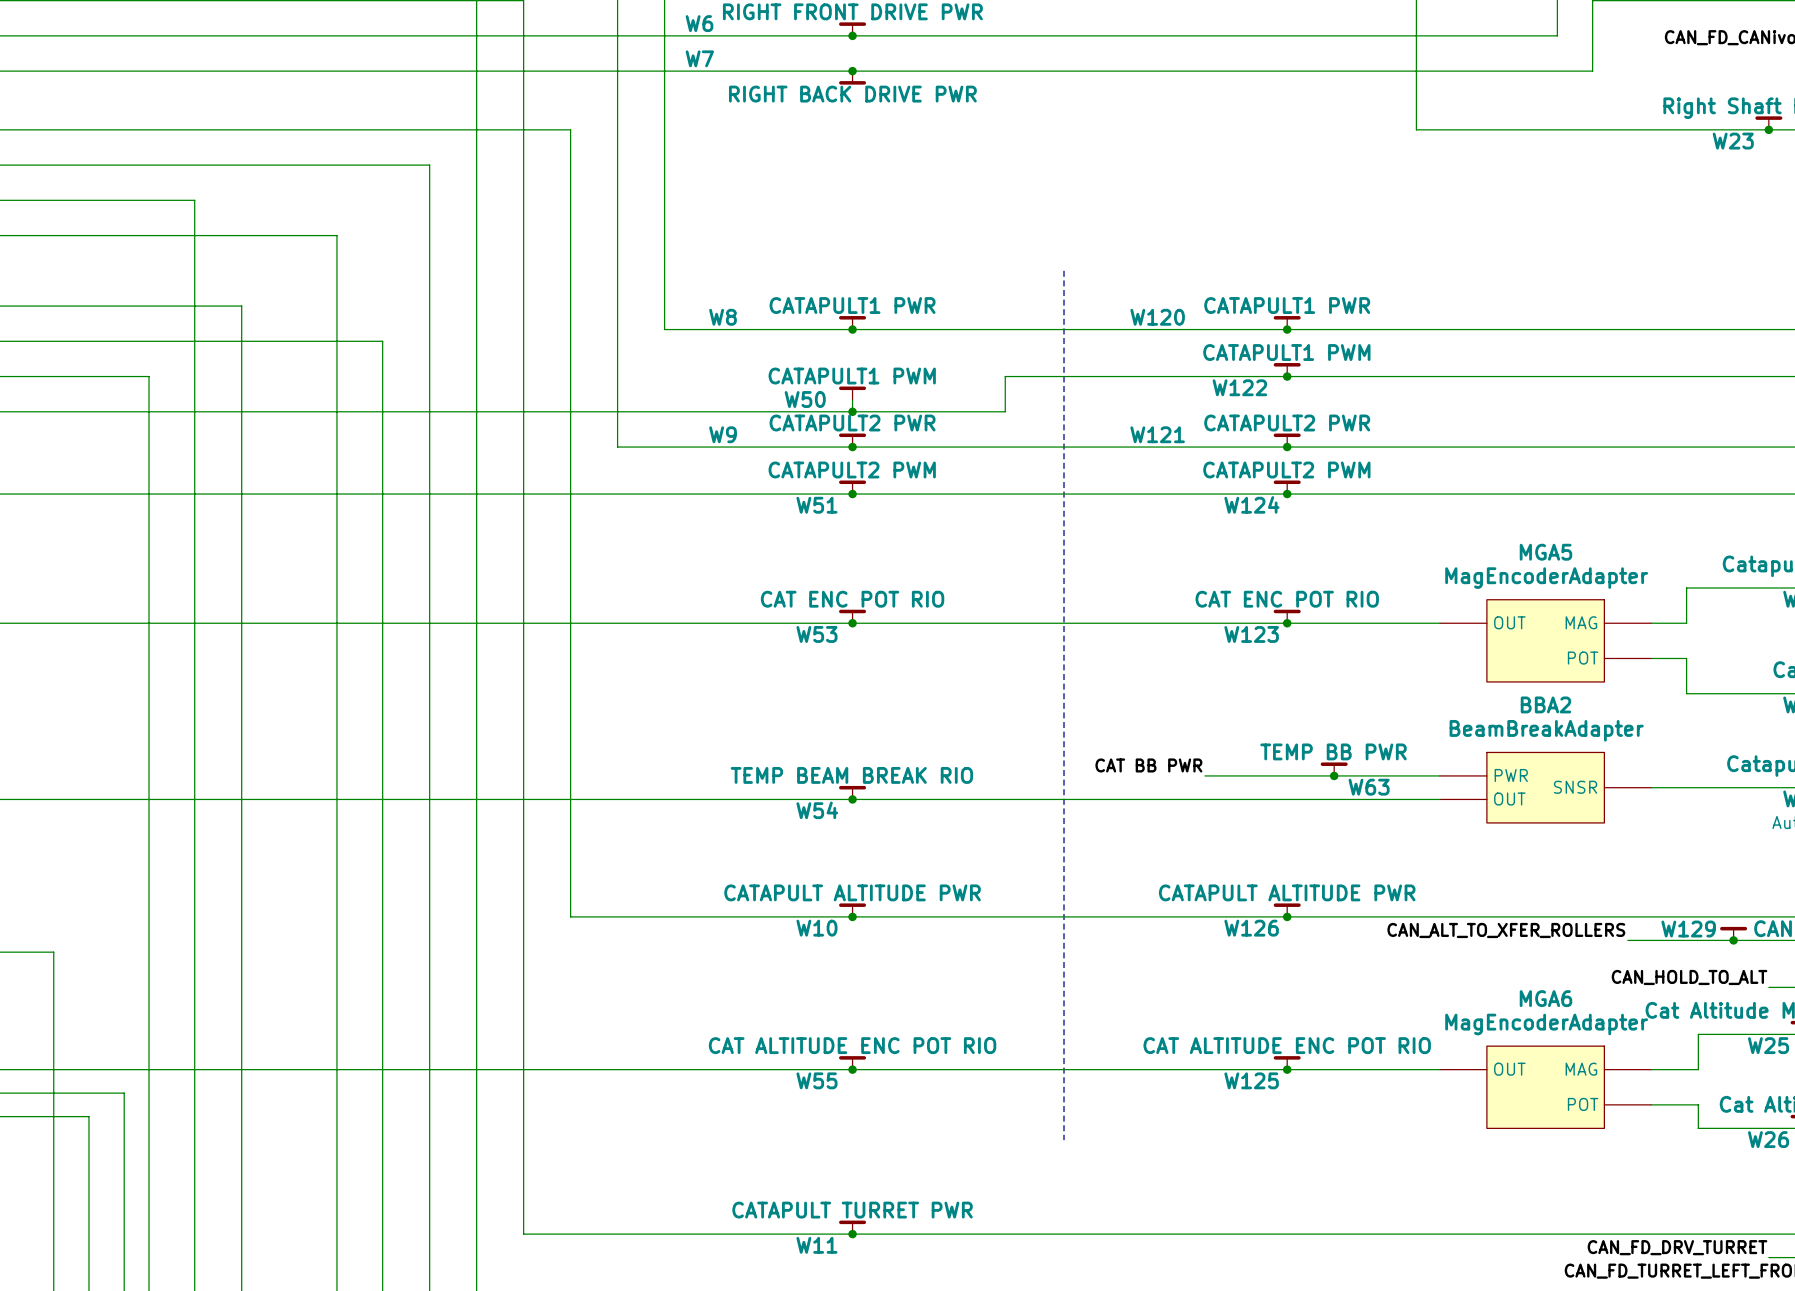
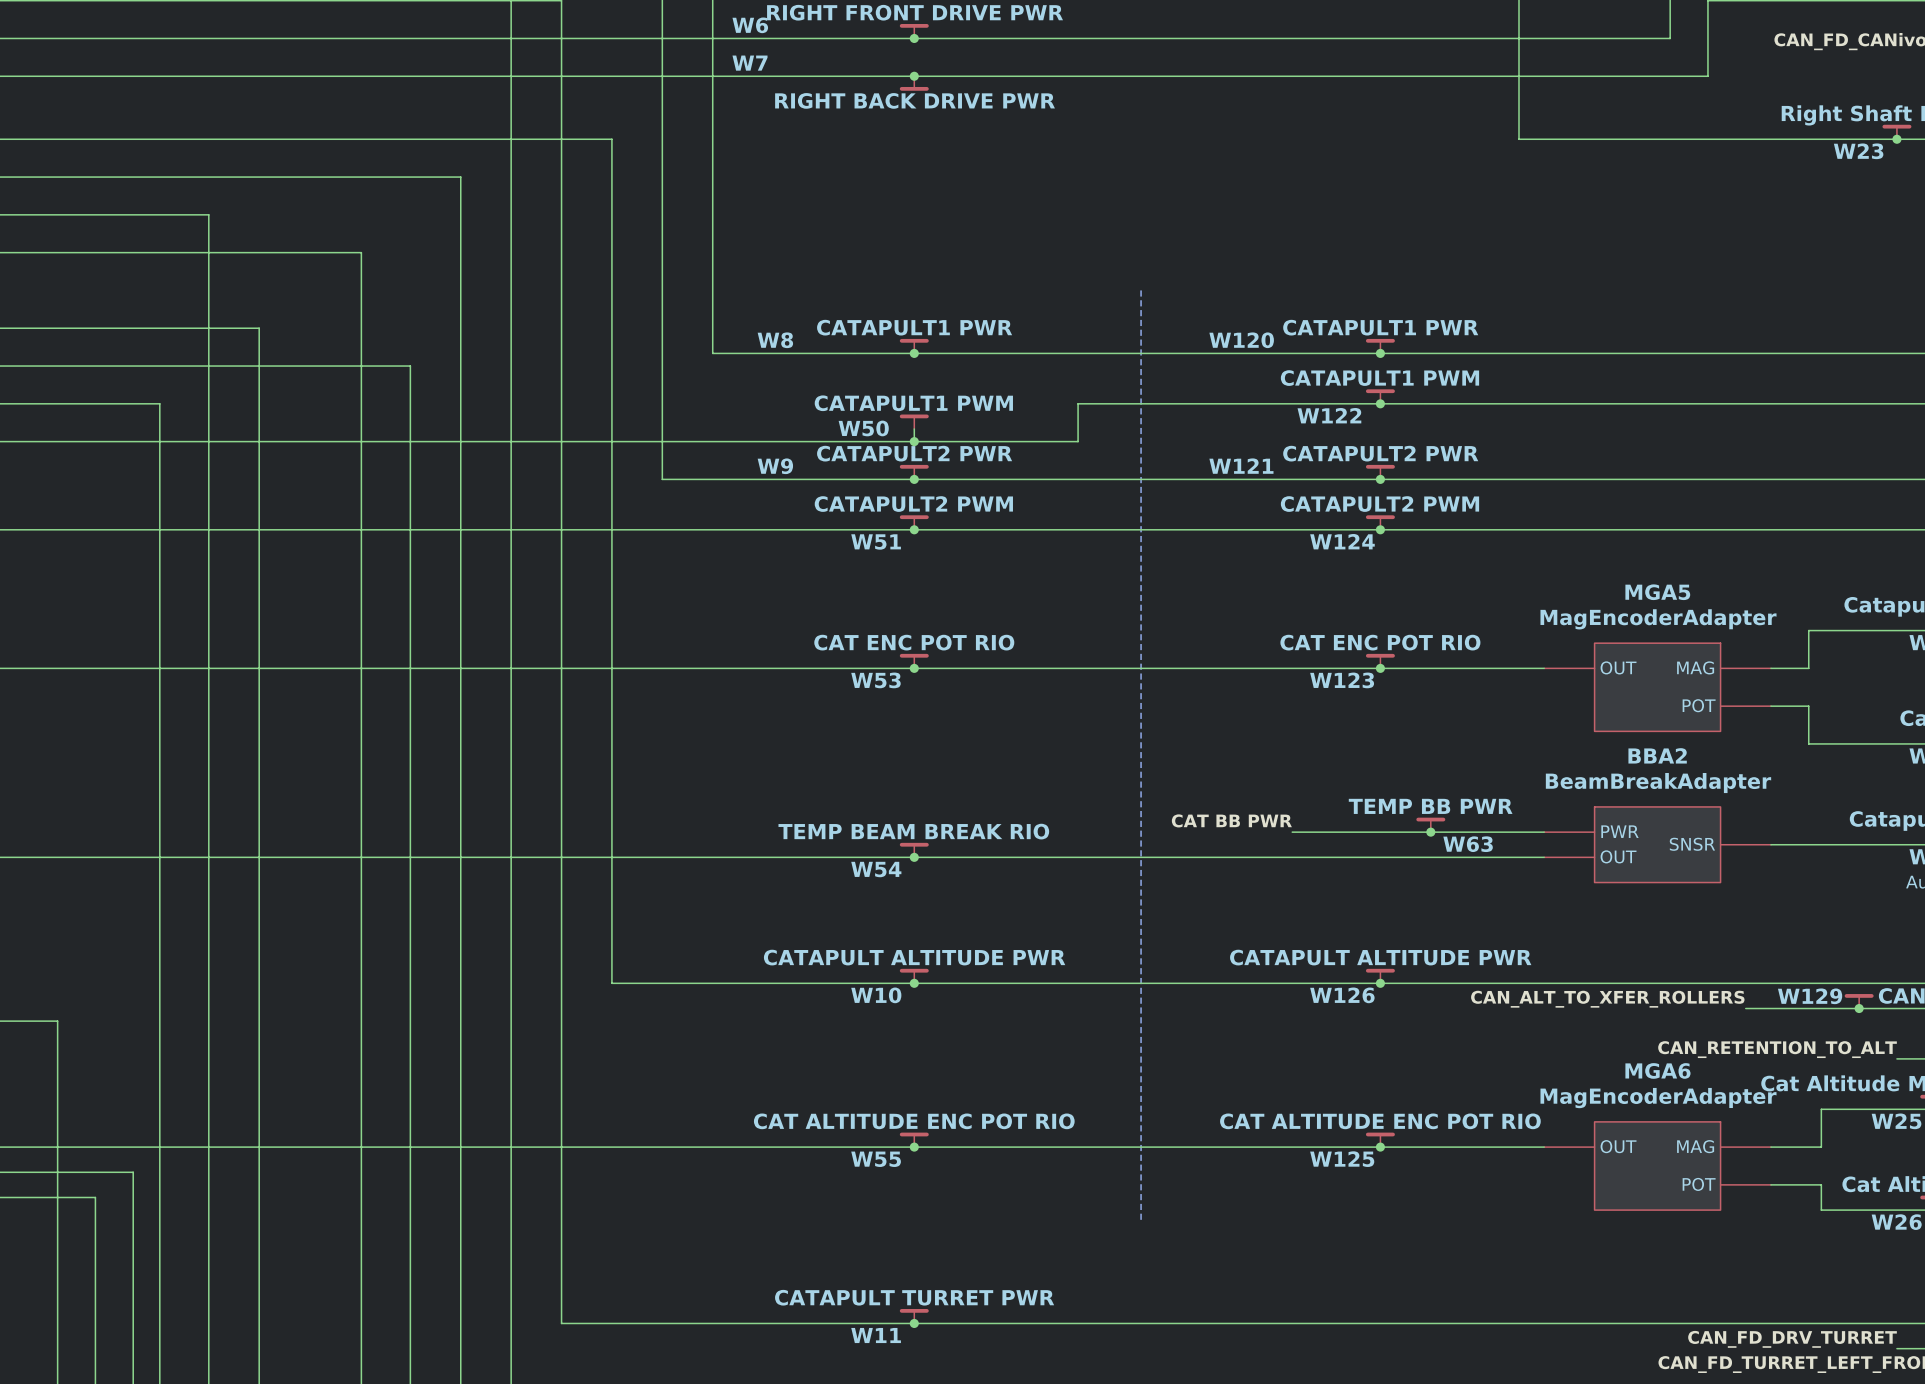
label: CAN_HOLD_TO_ALT (1689, 977) -> CAN_RETENTION_TO_ALT (1777, 1049)

